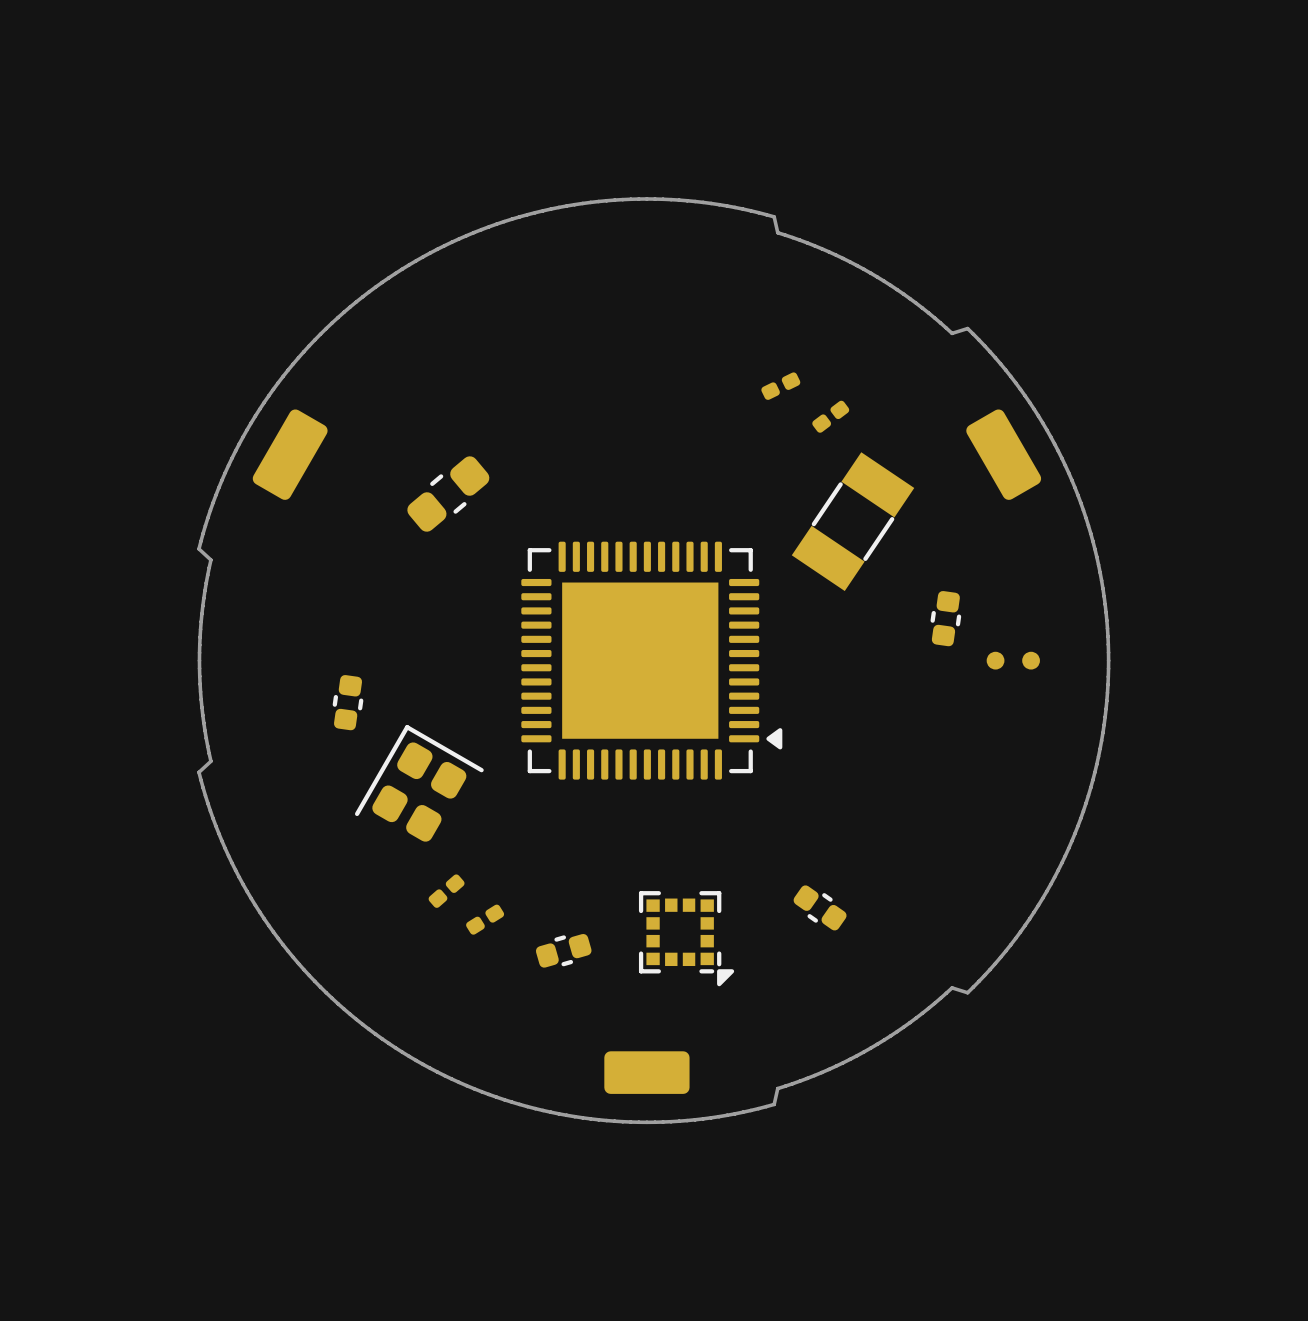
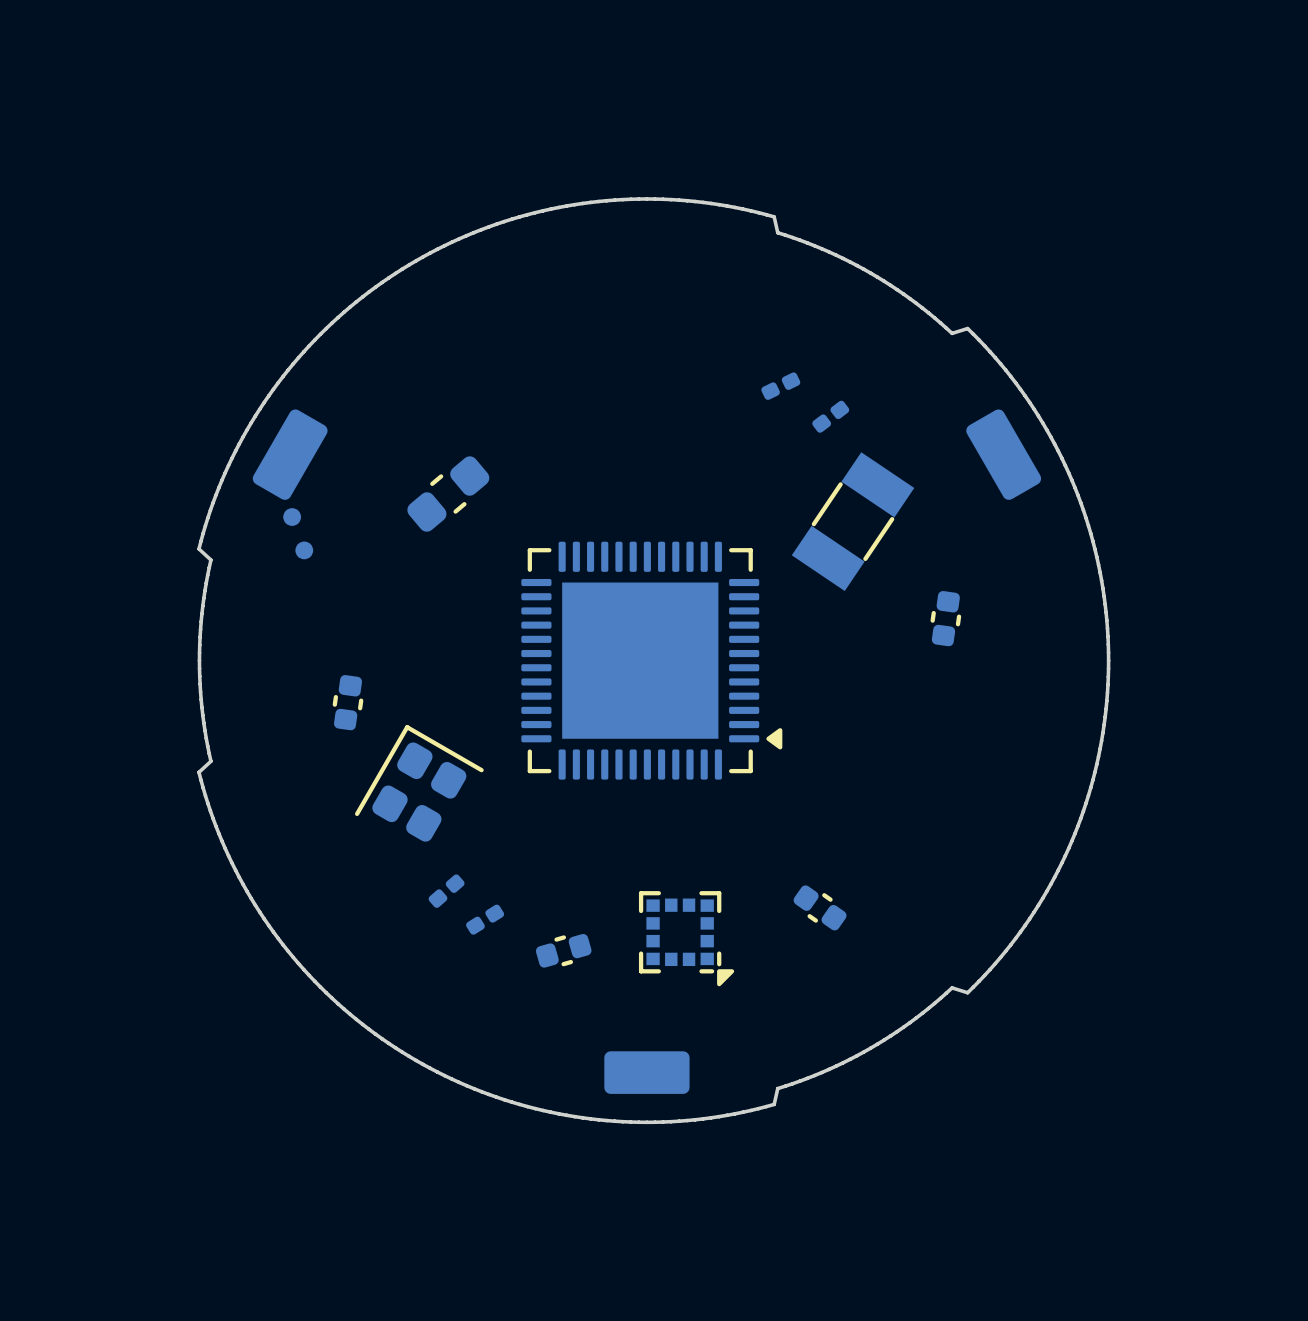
part: none -> (298, 533)
part: (1013, 660) -> none

